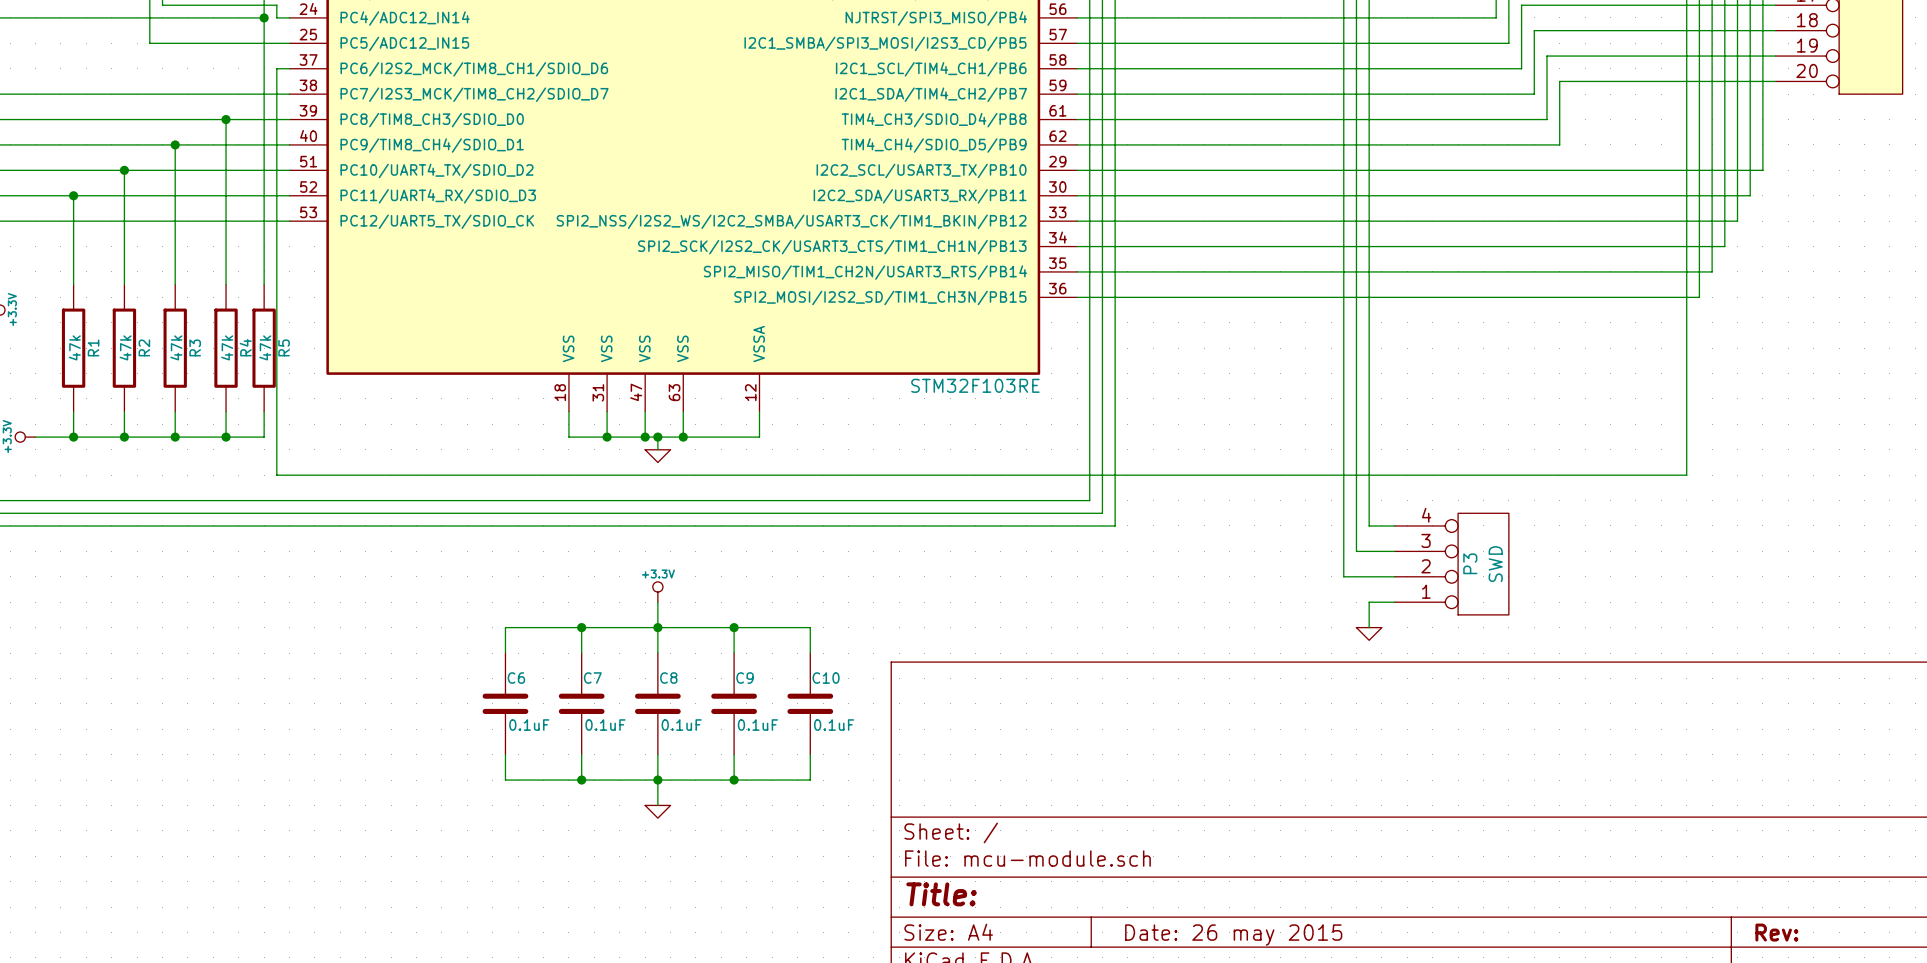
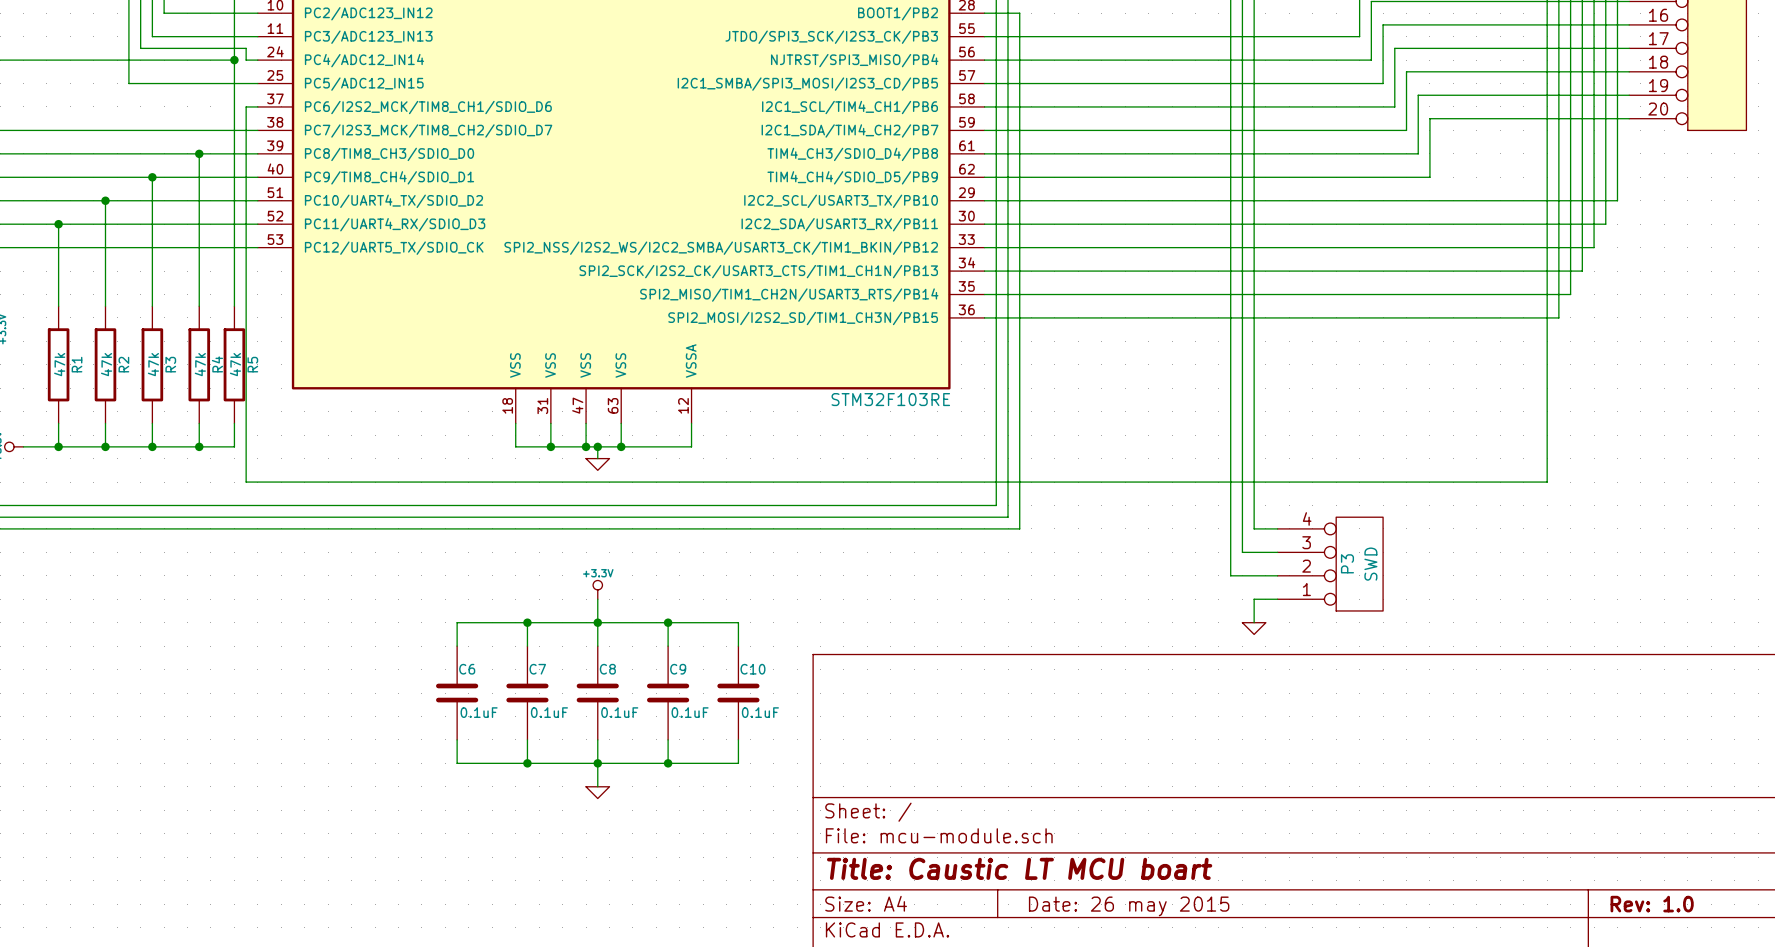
title block: Title: (941, 894) -> Title: Caustic LT MCU boart (1019, 868)
title block: Rev: (1776, 932) -> Rev: 1.0 (1652, 904)

